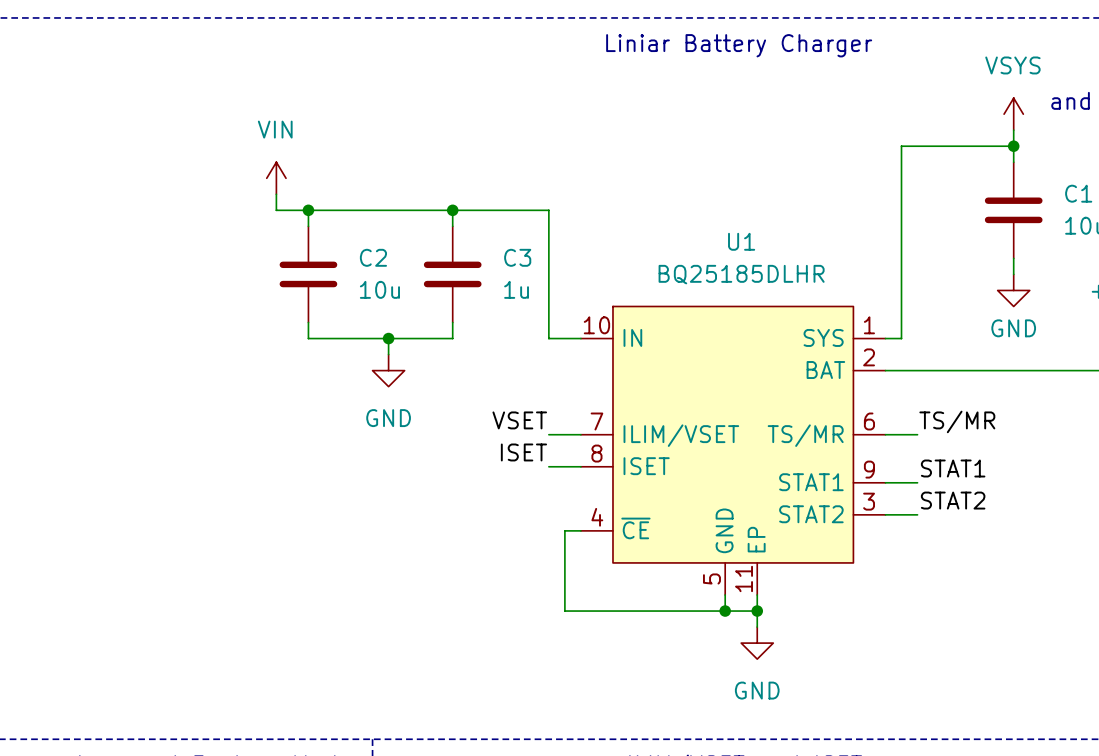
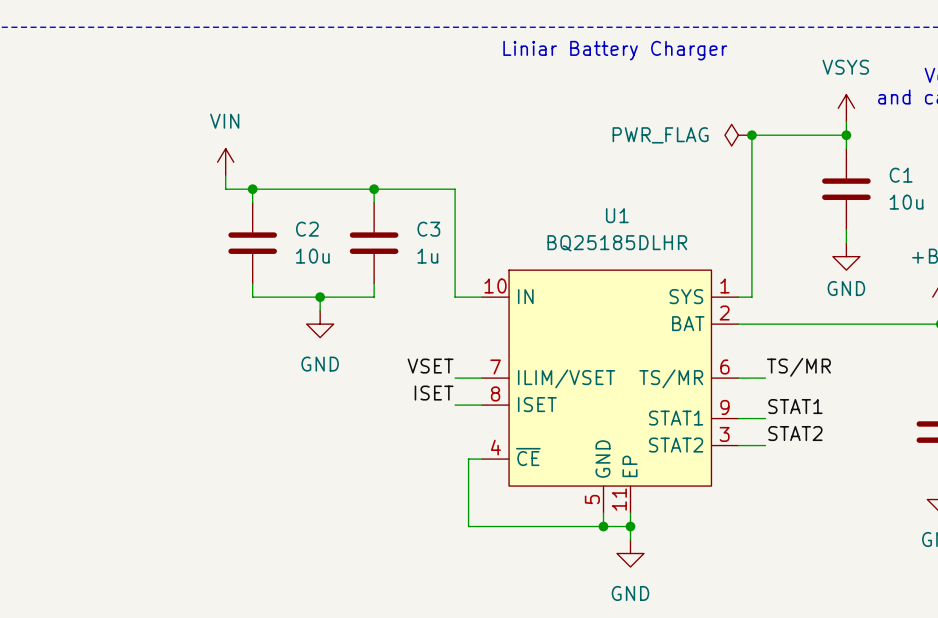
power symbol: none -> PWR_FLAG (738, 135)
junction: none -> (751, 135)

